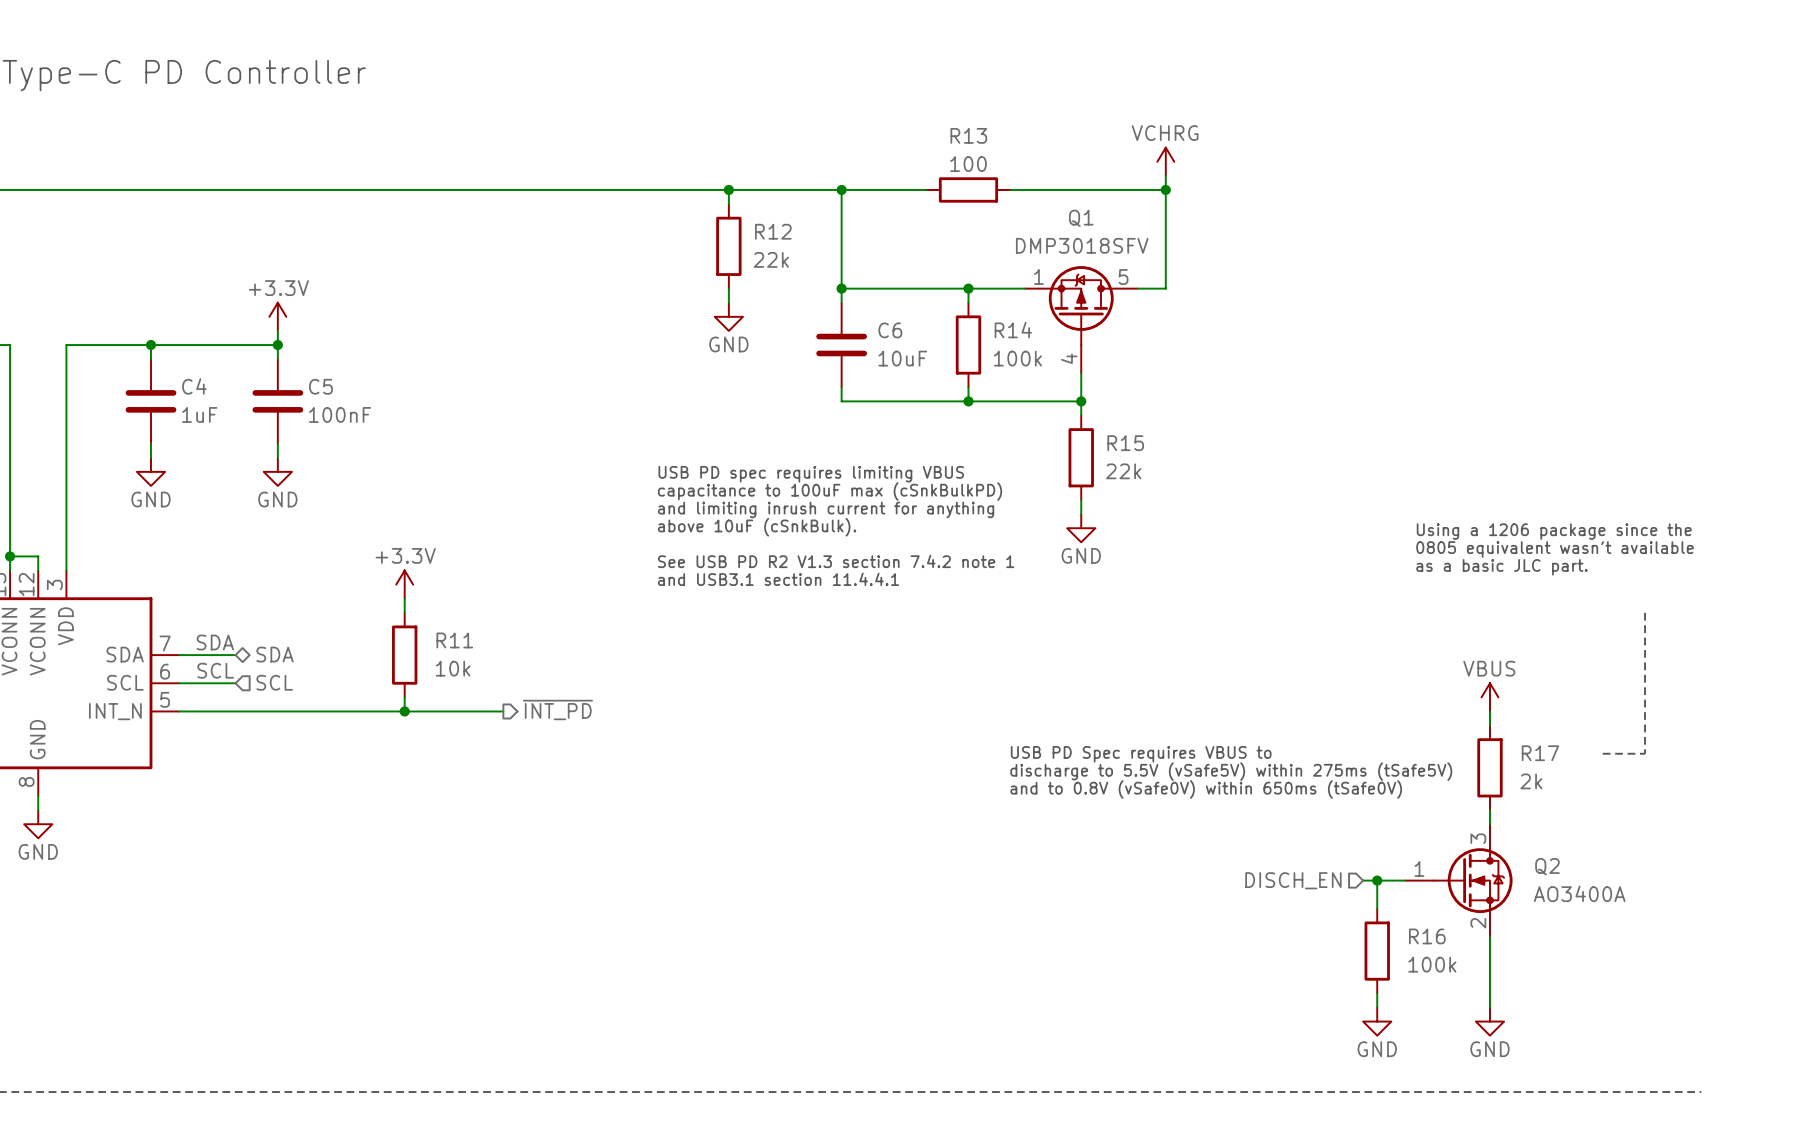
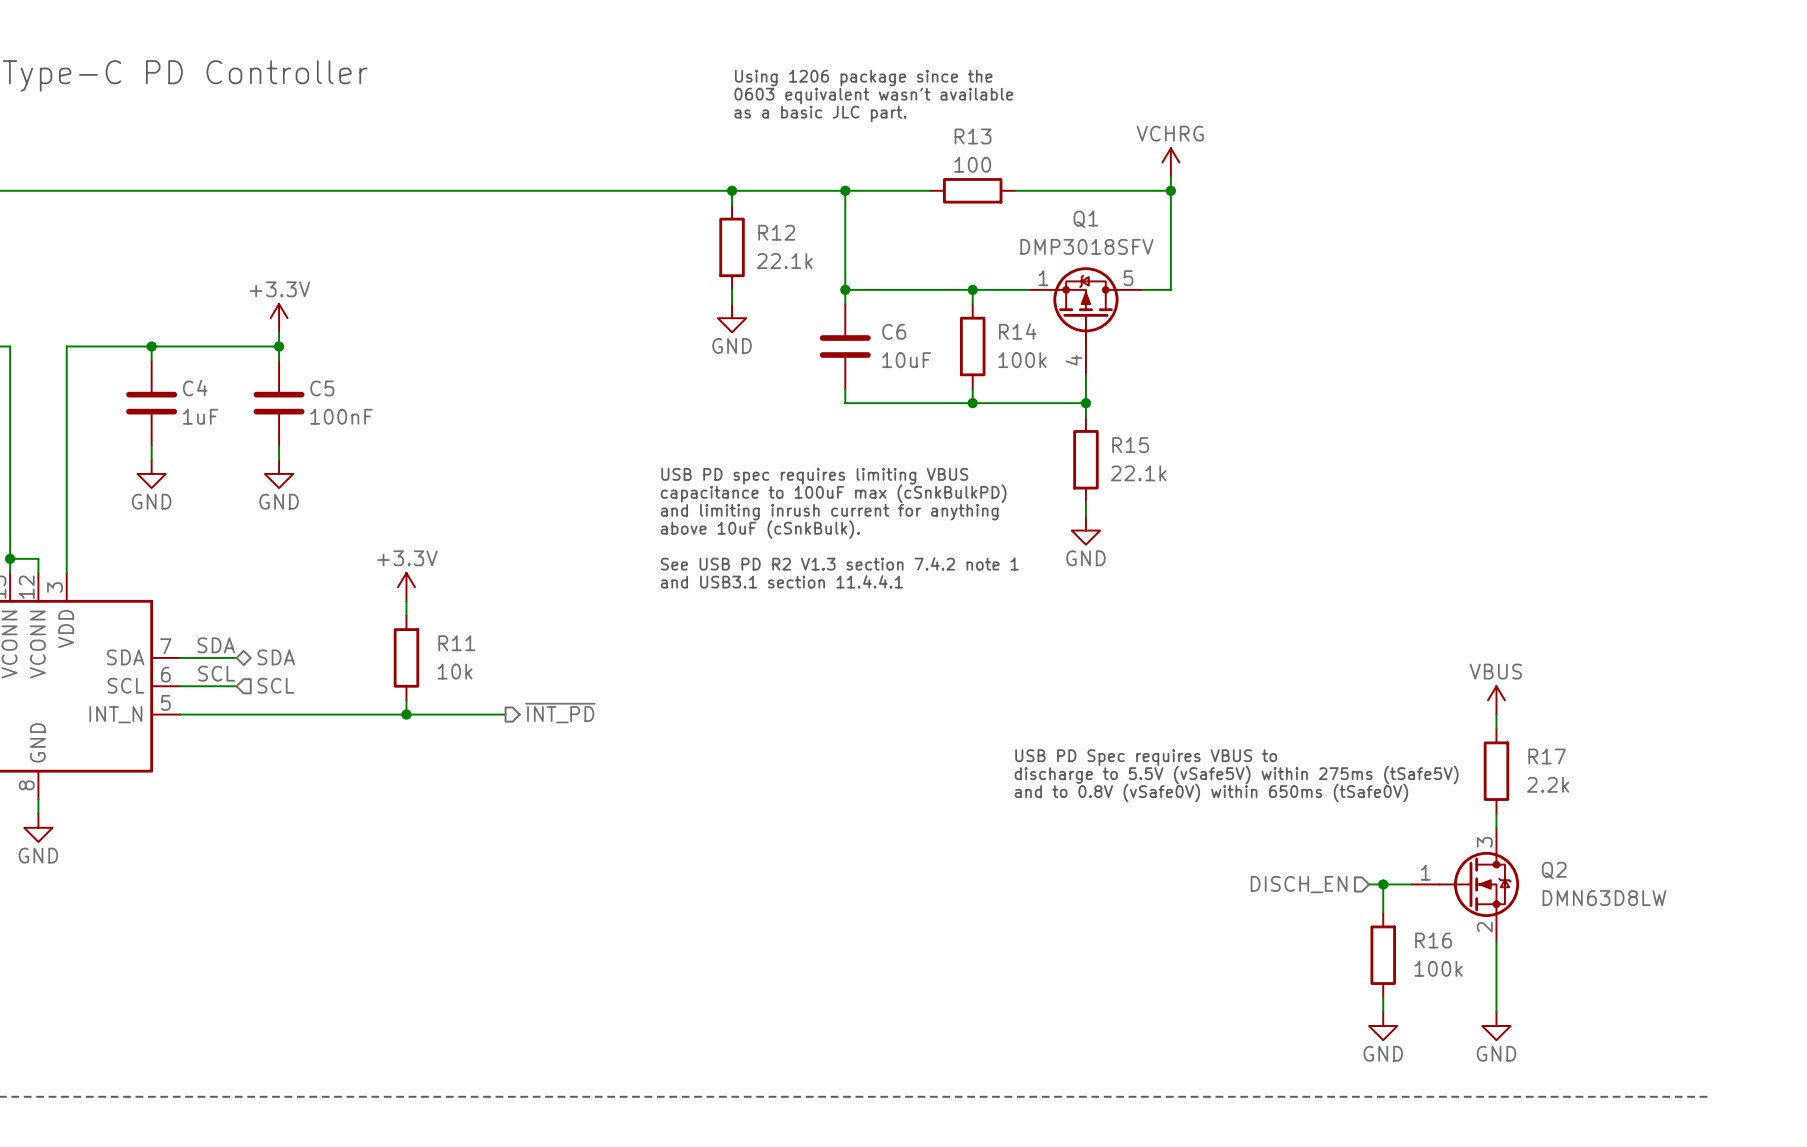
text: none -> Using 1206 package since the (863, 78)
text: none -> 0603 equivalent wasn't available (873, 96)
text: none -> as a basic JLC part. (820, 113)
R12 value: 22k (771, 259) -> 22.1k (784, 261)
R15 value: 22k (1123, 471) -> 22.1k (1138, 473)
text: Using a 1206 package since the (1554, 531) -> none
text: 0805 equivalent wasn't available (1555, 549) -> none
text: as a basic JLC part. (1501, 567) -> none
line: (1645, 612) (1645, 753) (1602, 753) -> none
R17 value: 2k (1531, 781) -> 2.2k (1548, 784)
Q2 value: AO3400A (1579, 893) -> DMN63D8LW (1604, 898)

